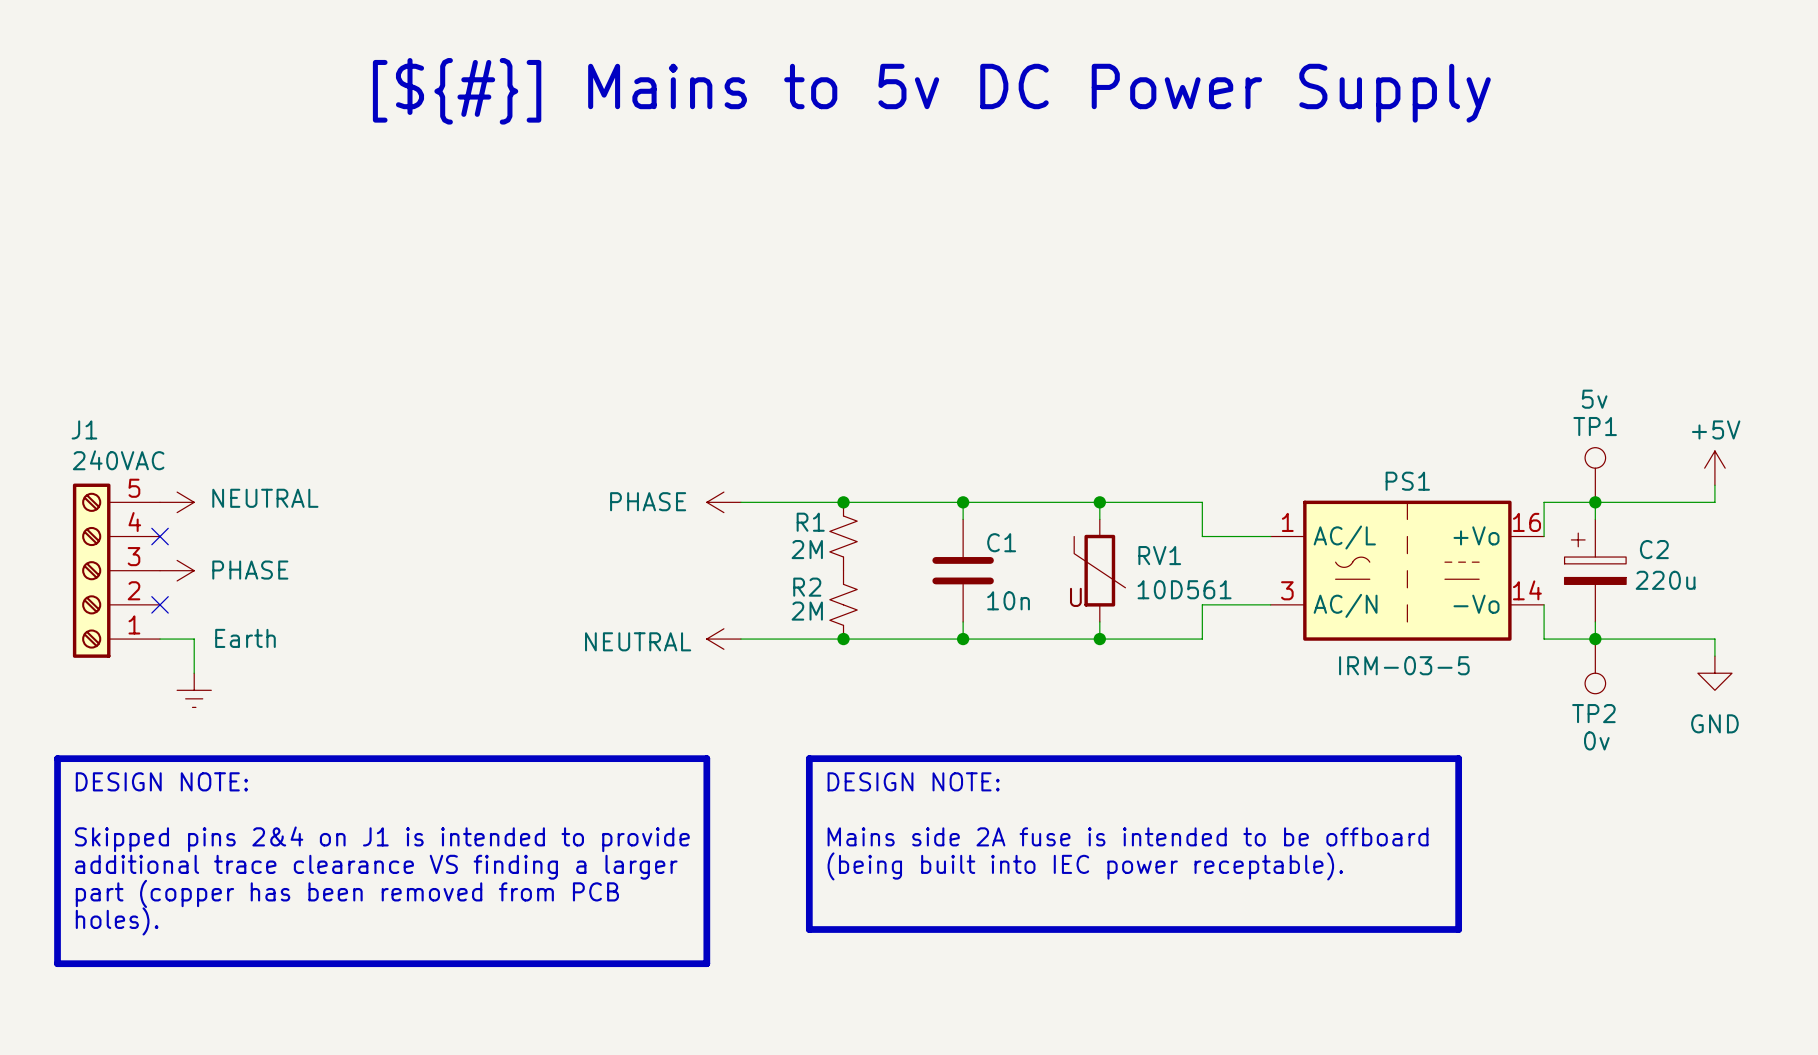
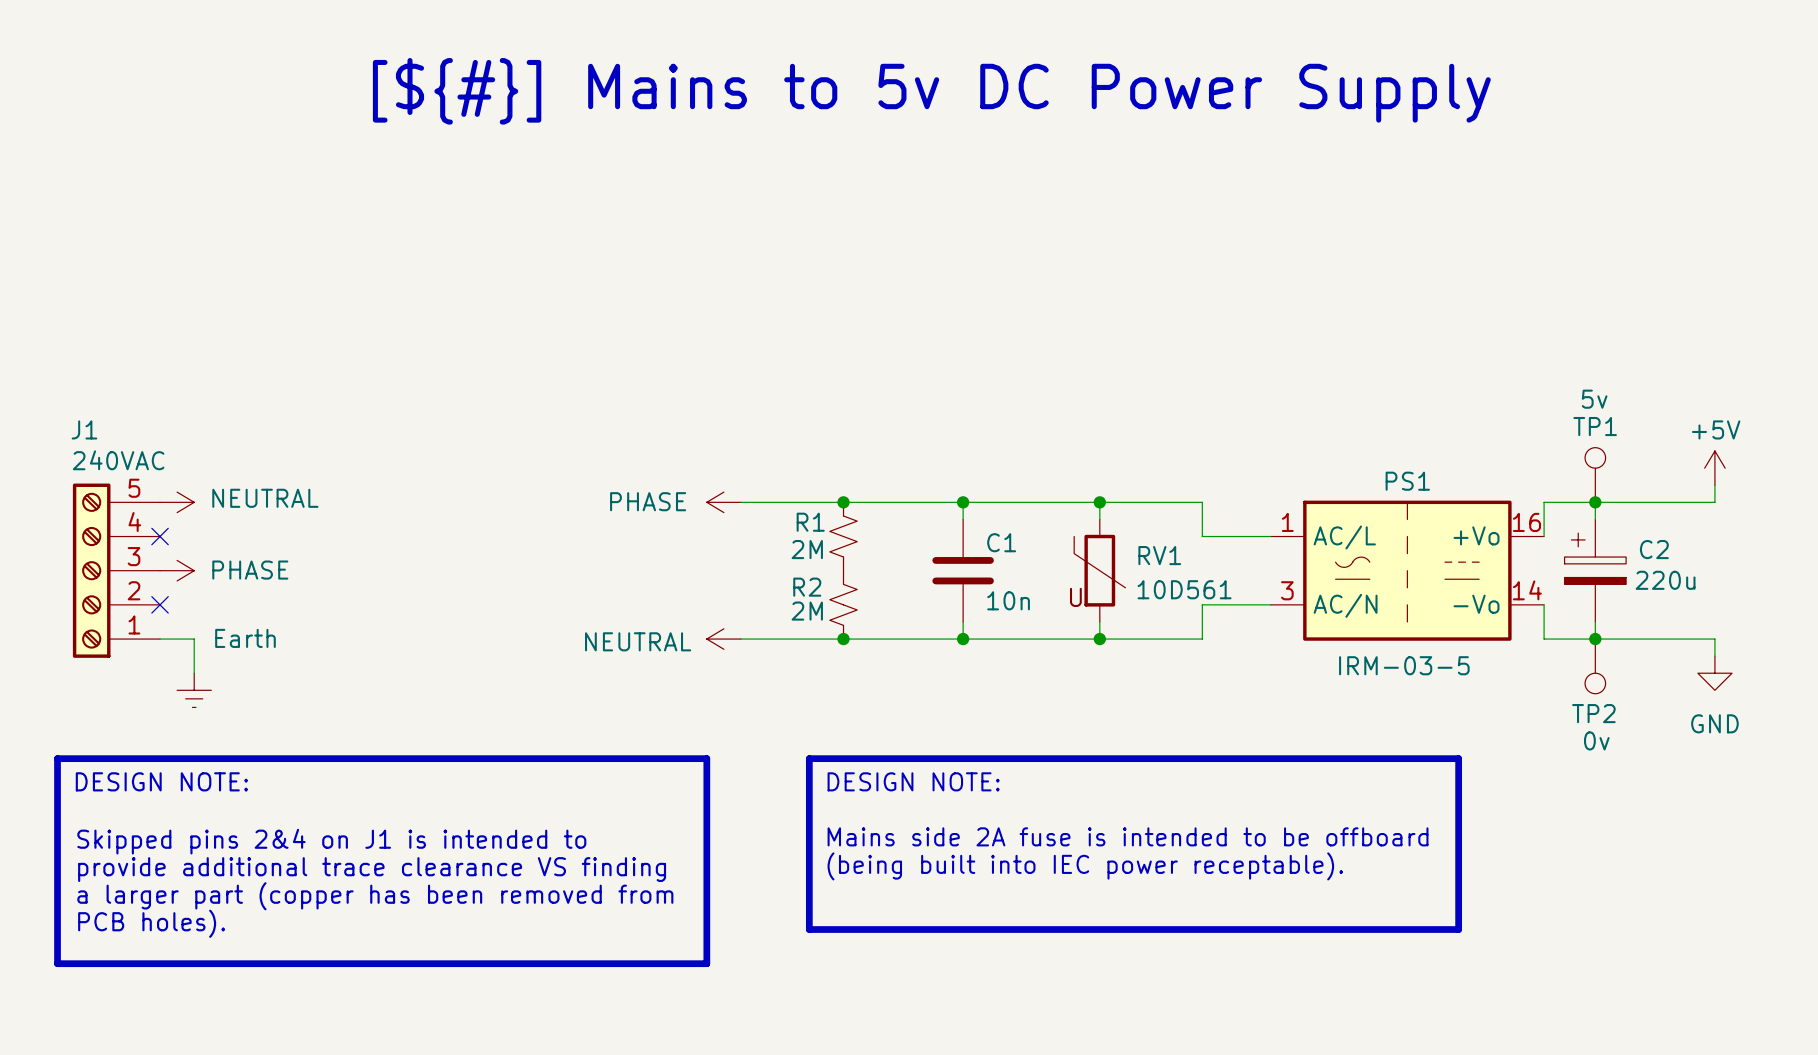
text: Skipped pins 2&4 on J1 is intended to provide (382, 839) -> Skipped pins 2&4 on J1 is intended to (331, 841)
text: additional trace clearance VS finding a larger (376, 867) -> provide additional trace clearance VS finding (372, 869)
text: part (copper has been removed from PCB (347, 893) -> a larger part (copper has been removed from (375, 896)
text: holes). (117, 921) -> PCB holes). (151, 923)

